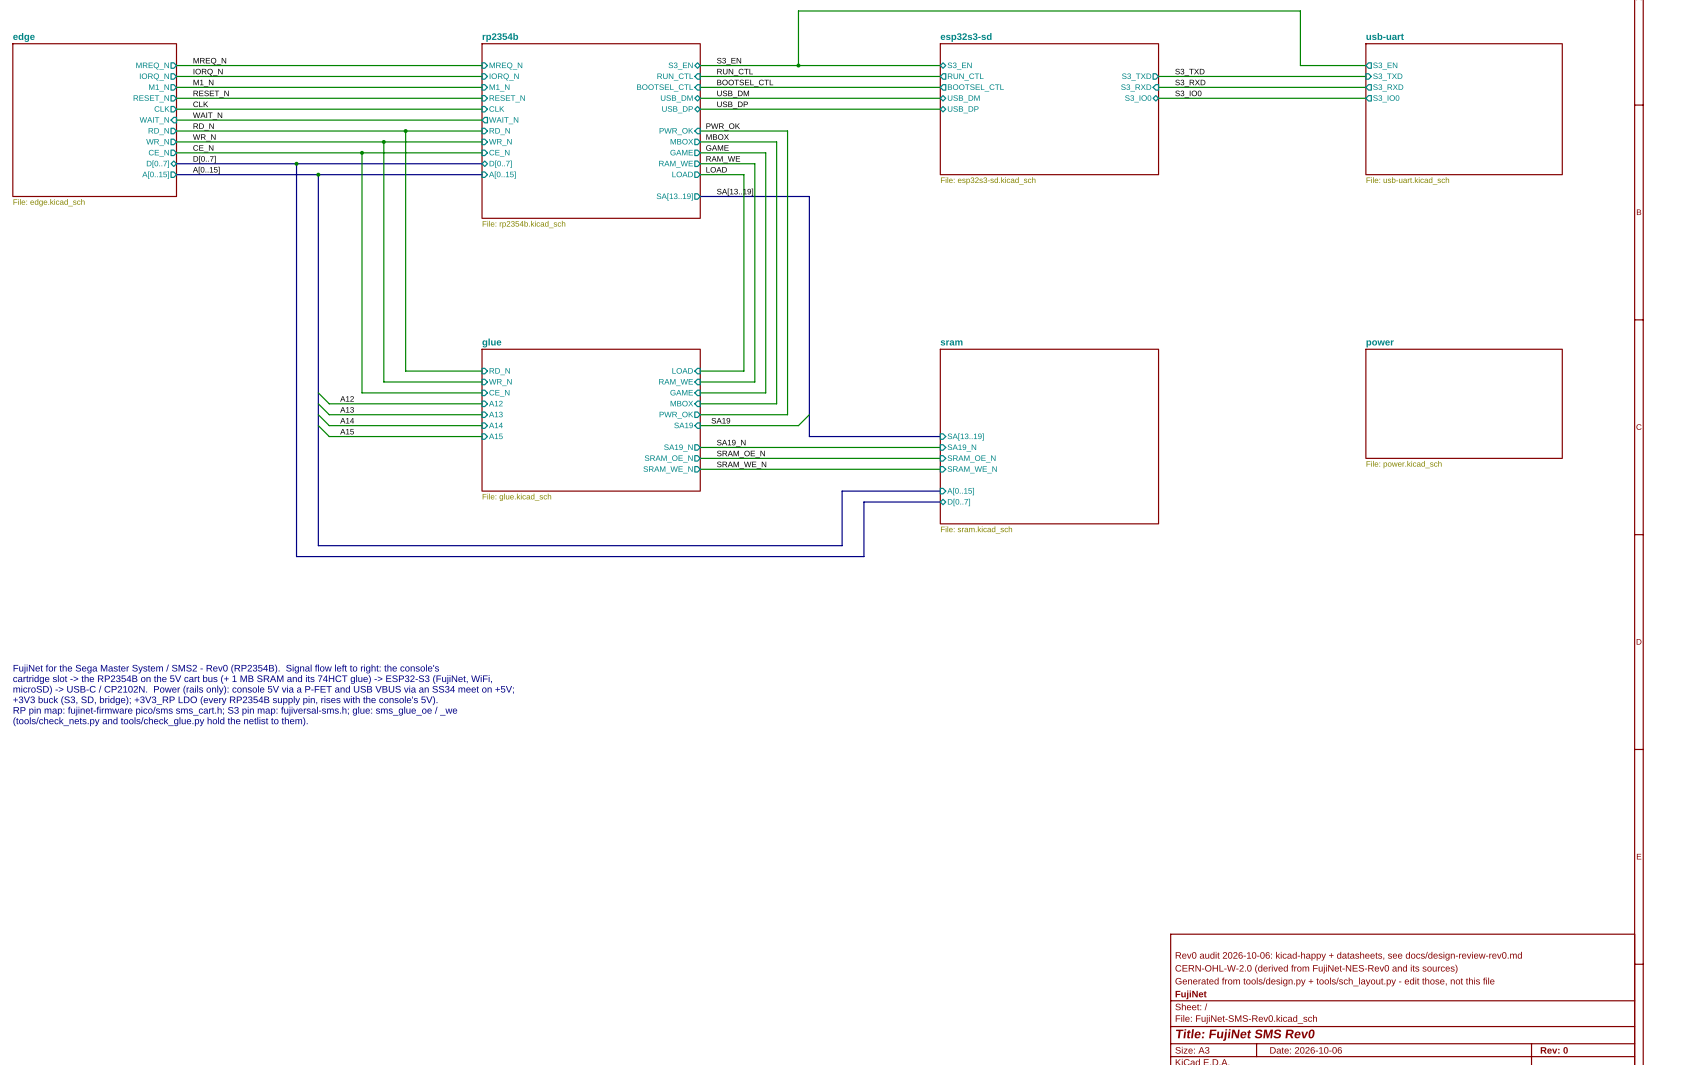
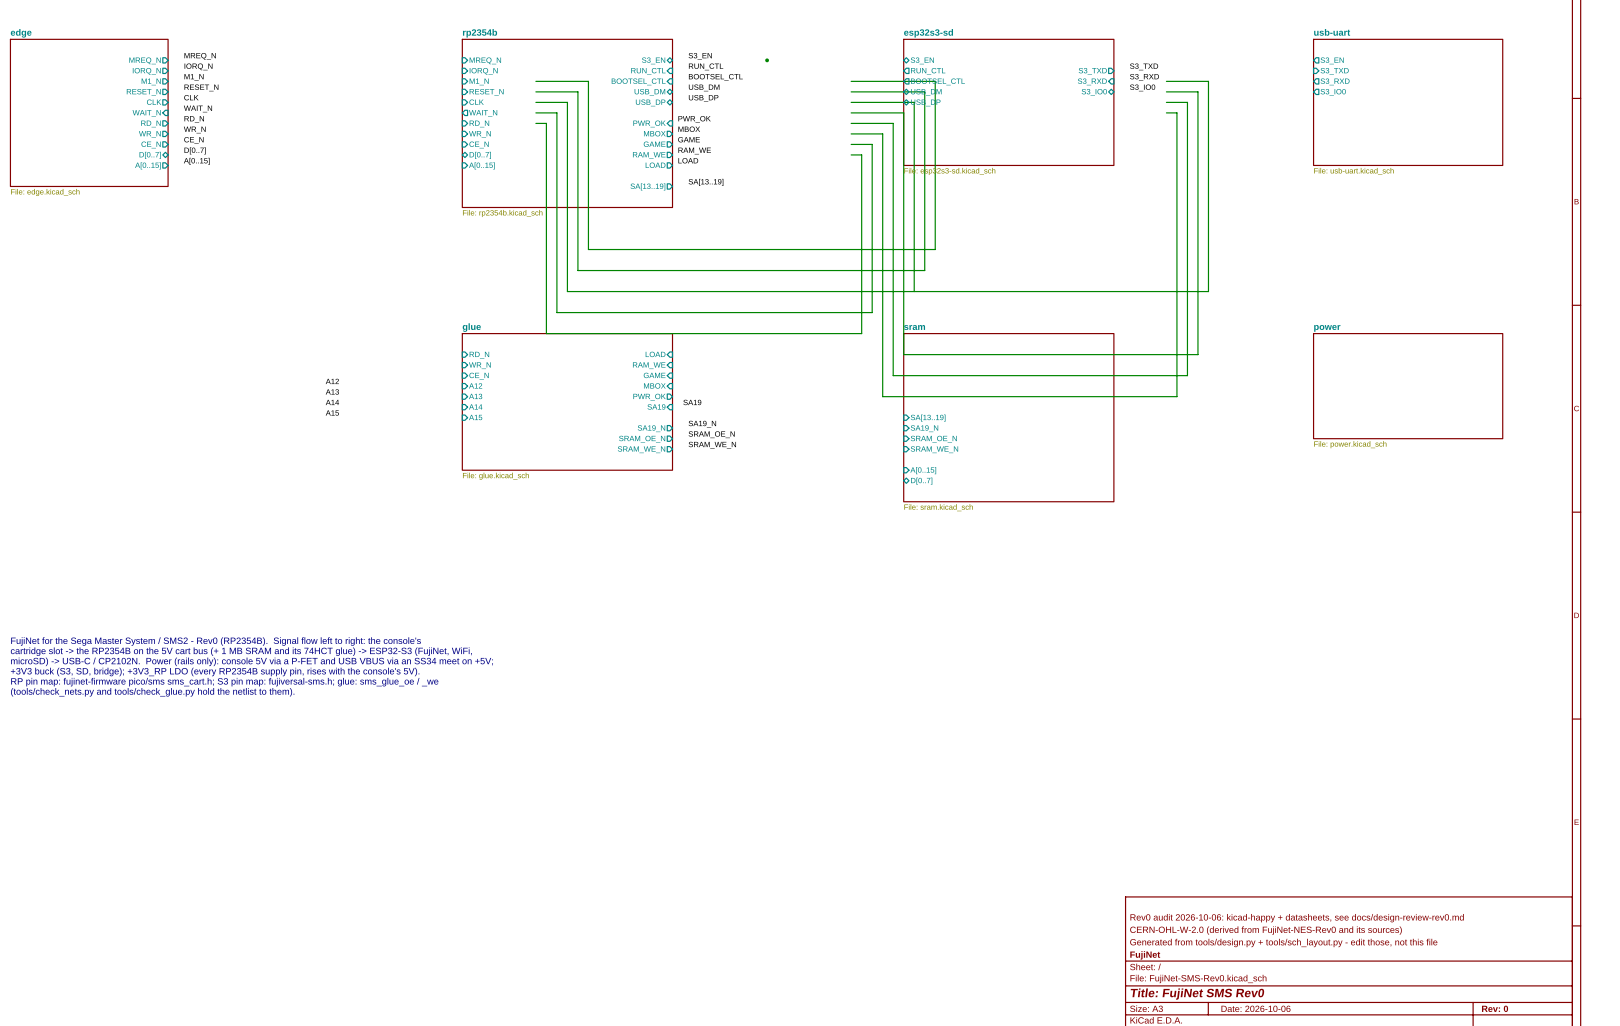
wire: (176, 65) (482, 65) -> none
wire: (700, 65) (940, 65) -> none
wire: (798, 65) (798, 10) (1300, 10) (1300, 65) (1365, 65) -> none
wire: (176, 76) (482, 76) -> none
wire: (700, 76) (940, 76) -> none
wire: (1158, 76) (1365, 76) -> none
wire: (176, 87) (482, 87) -> none
wire: none -> (535, 81) (588, 81) (588, 249) (935, 249) (935, 81) (903, 81)
wire: (700, 87) (885, 87) -> none
wire: (1158, 87) (1213, 87) -> none
wire: (1256, 87) (1365, 87) -> (1208, 81) (1208, 291) (567, 291) (567, 102) (535, 102)
wire: (176, 98) (482, 98) -> none
wire: none -> (535, 91) (577, 91) (577, 270) (924, 270) (924, 91) (903, 91)
wire: (700, 98) (885, 98) -> none
wire: (1158, 98) (1213, 98) -> none
wire: (1245, 98) (1365, 98) -> (1197, 91) (1197, 354) (903, 354) (903, 112) (851, 112)
wire: (176, 109) (482, 109) -> none
wire: (700, 109) (885, 109) -> none
wire: none -> (903, 102) (914, 102) (914, 291)
wire: none -> (1166, 102) (1187, 102) (1187, 375) (893, 375) (893, 123) (851, 123)
wire: (176, 120) (482, 120) -> none
wire: none -> (535, 112) (556, 112) (556, 312) (872, 312) (872, 144) (851, 144)
wire: none -> (1166, 112) (1176, 112) (1176, 396) (882, 396) (882, 133) (851, 133)
wire: (176, 131) (482, 131) -> none
wire: (405, 131) (405, 371) (482, 371) -> none
junction: (405, 131) -> none
wire: none -> (535, 123) (546, 123) (546, 333) (861, 333) (861, 154) (851, 154)
wire: (700, 131) (787, 131) (787, 414) (700, 414) -> none
wire: (176, 141) (482, 141) -> none
wire: (383, 141) (383, 381) (482, 381) -> none
junction: (383, 141) -> none
wire: (700, 141) (776, 141) (776, 403) (700, 403) -> none
wire: (176, 152) (482, 152) -> none
wire: (361, 152) (361, 392) (482, 392) -> none
junction: (361, 152) -> none
wire: (700, 152) (765, 152) (765, 392) (700, 392) -> none
bus: (176, 163) (482, 163) -> none
bus: (296, 163) (296, 556) (863, 556) (863, 502) (940, 502) -> none
junction: (296, 163) -> none
wire: (700, 163) (754, 163) (754, 381) (700, 381) -> none
bus: (176, 174) (482, 174) -> none
bus: (318, 174) (318, 545) (842, 545) (842, 491) (940, 491) -> none
junction: (318, 174) -> none
wire: (700, 174) (743, 174) (743, 371) (700, 371) -> none
bus: (700, 196) (809, 196) (809, 436) (940, 436) -> none
wire: (318, 392) (329, 403) (482, 403) -> none
wire: (318, 403) (329, 414) (482, 414) -> none
wire: (318, 414) (329, 425) (482, 425) -> none
wire: (809, 414) (798, 425) (700, 425) -> none
wire: (318, 425) (329, 436) (482, 436) -> none
wire: (700, 447) (940, 447) -> none
wire: (700, 458) (940, 458) -> none
wire: (700, 469) (940, 469) -> none

